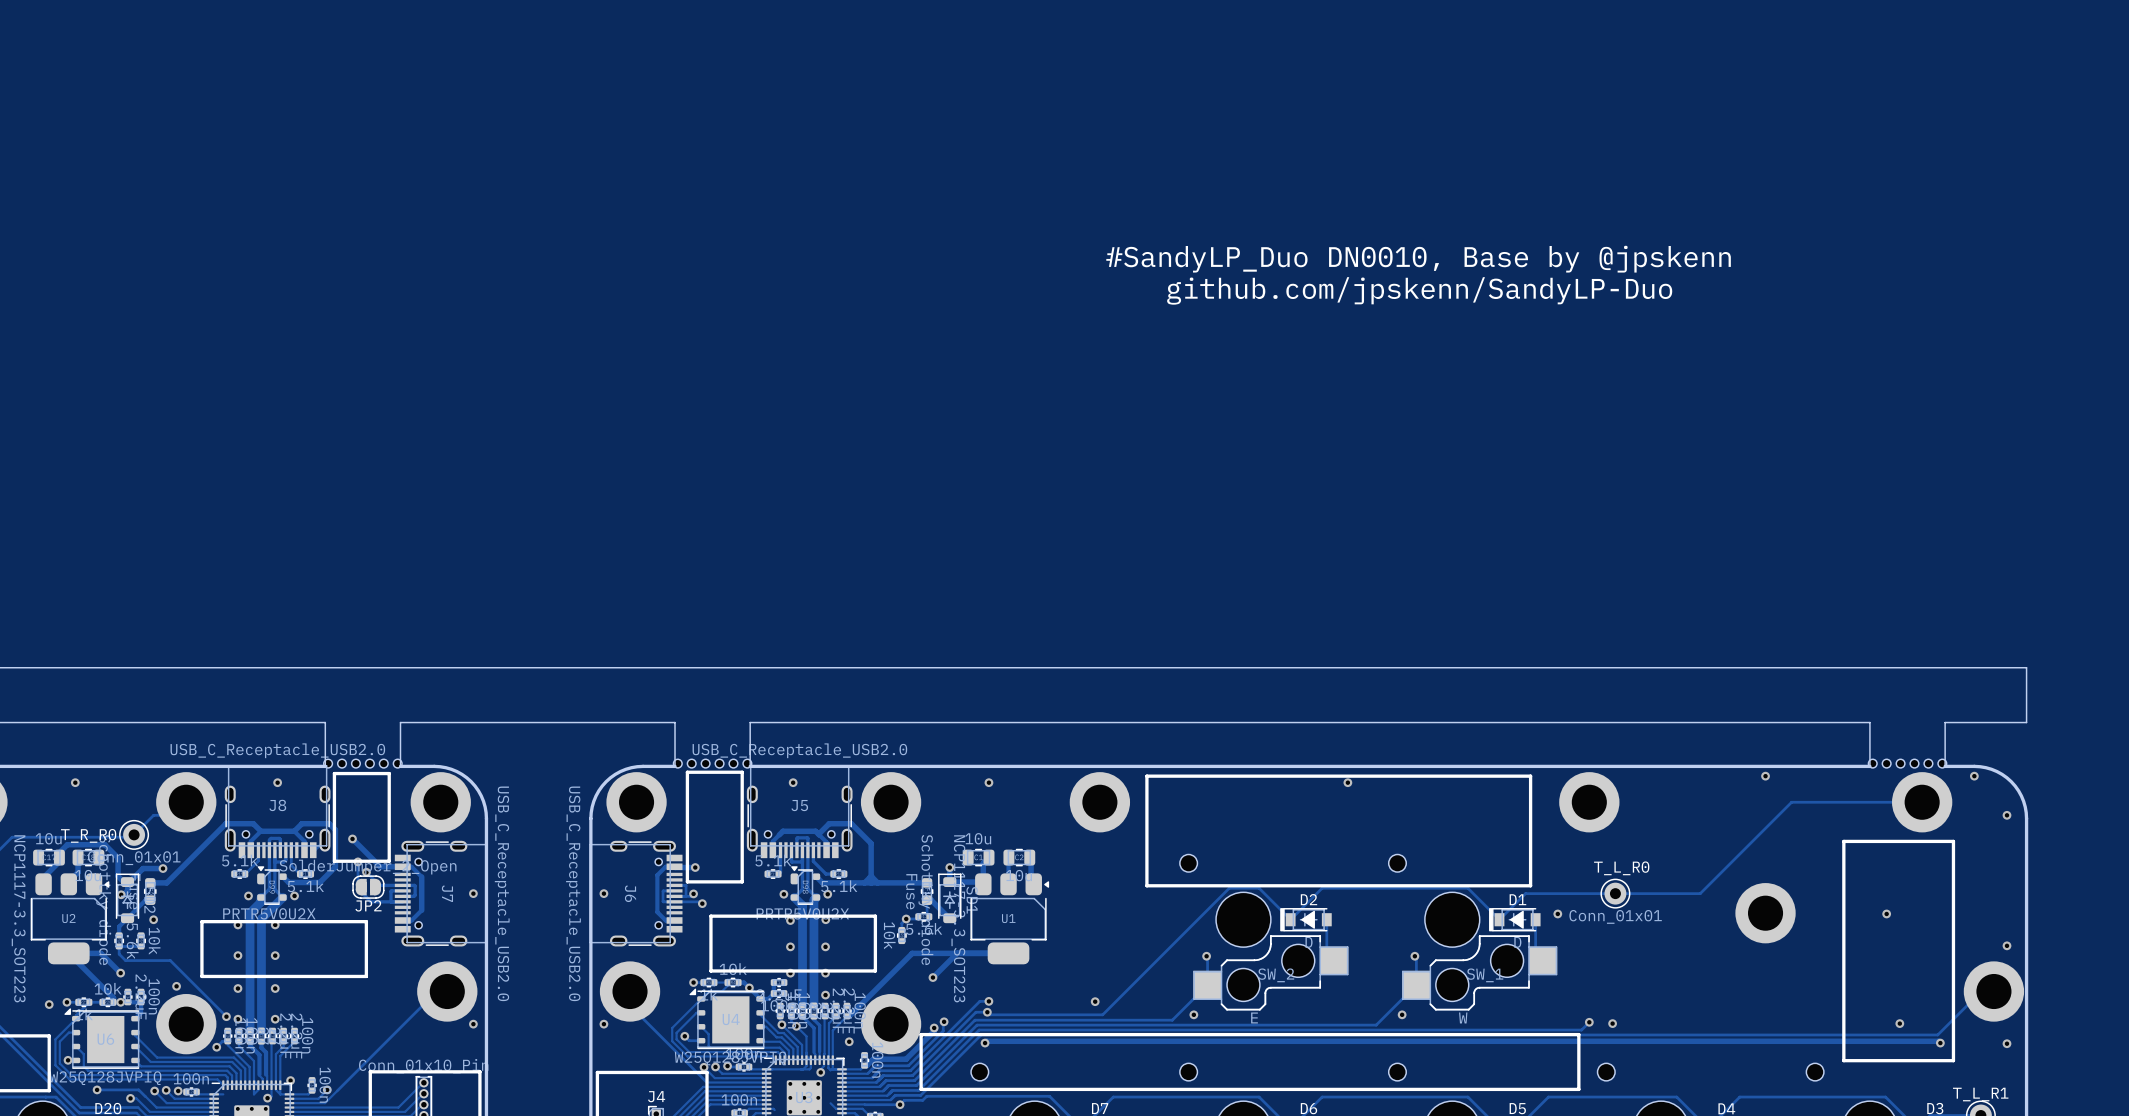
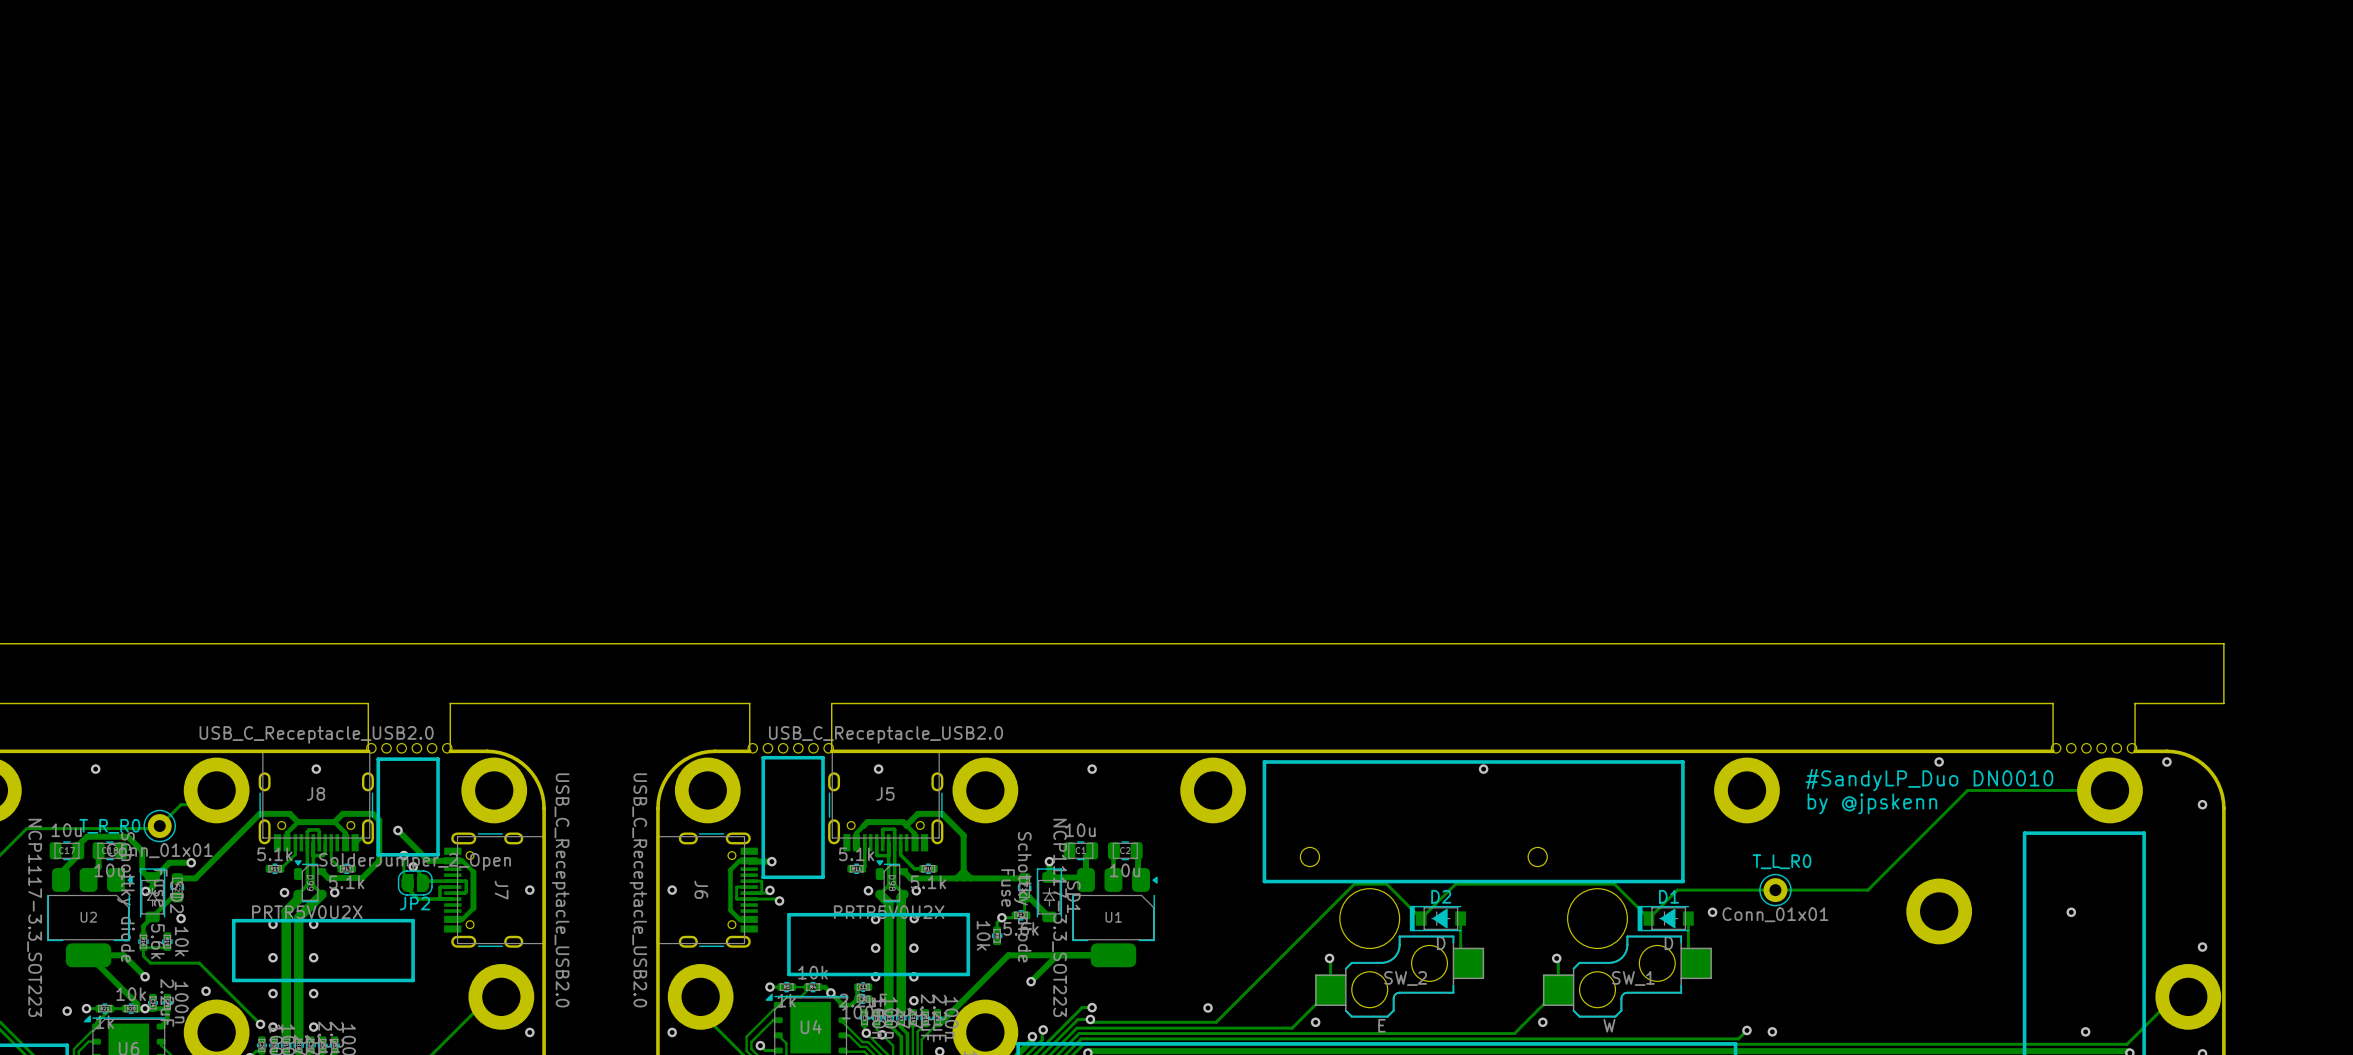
text: #SandyLP_Duo DN0010, Base by @jpskenn (1418, 259) -> none
text: github.com/jpskenn/SandyLP-Duo (1419, 290) -> none
text: none -> #SandyLP_Duo DN0010 (1929, 780)
text: none -> by @jpskenn (1872, 803)

